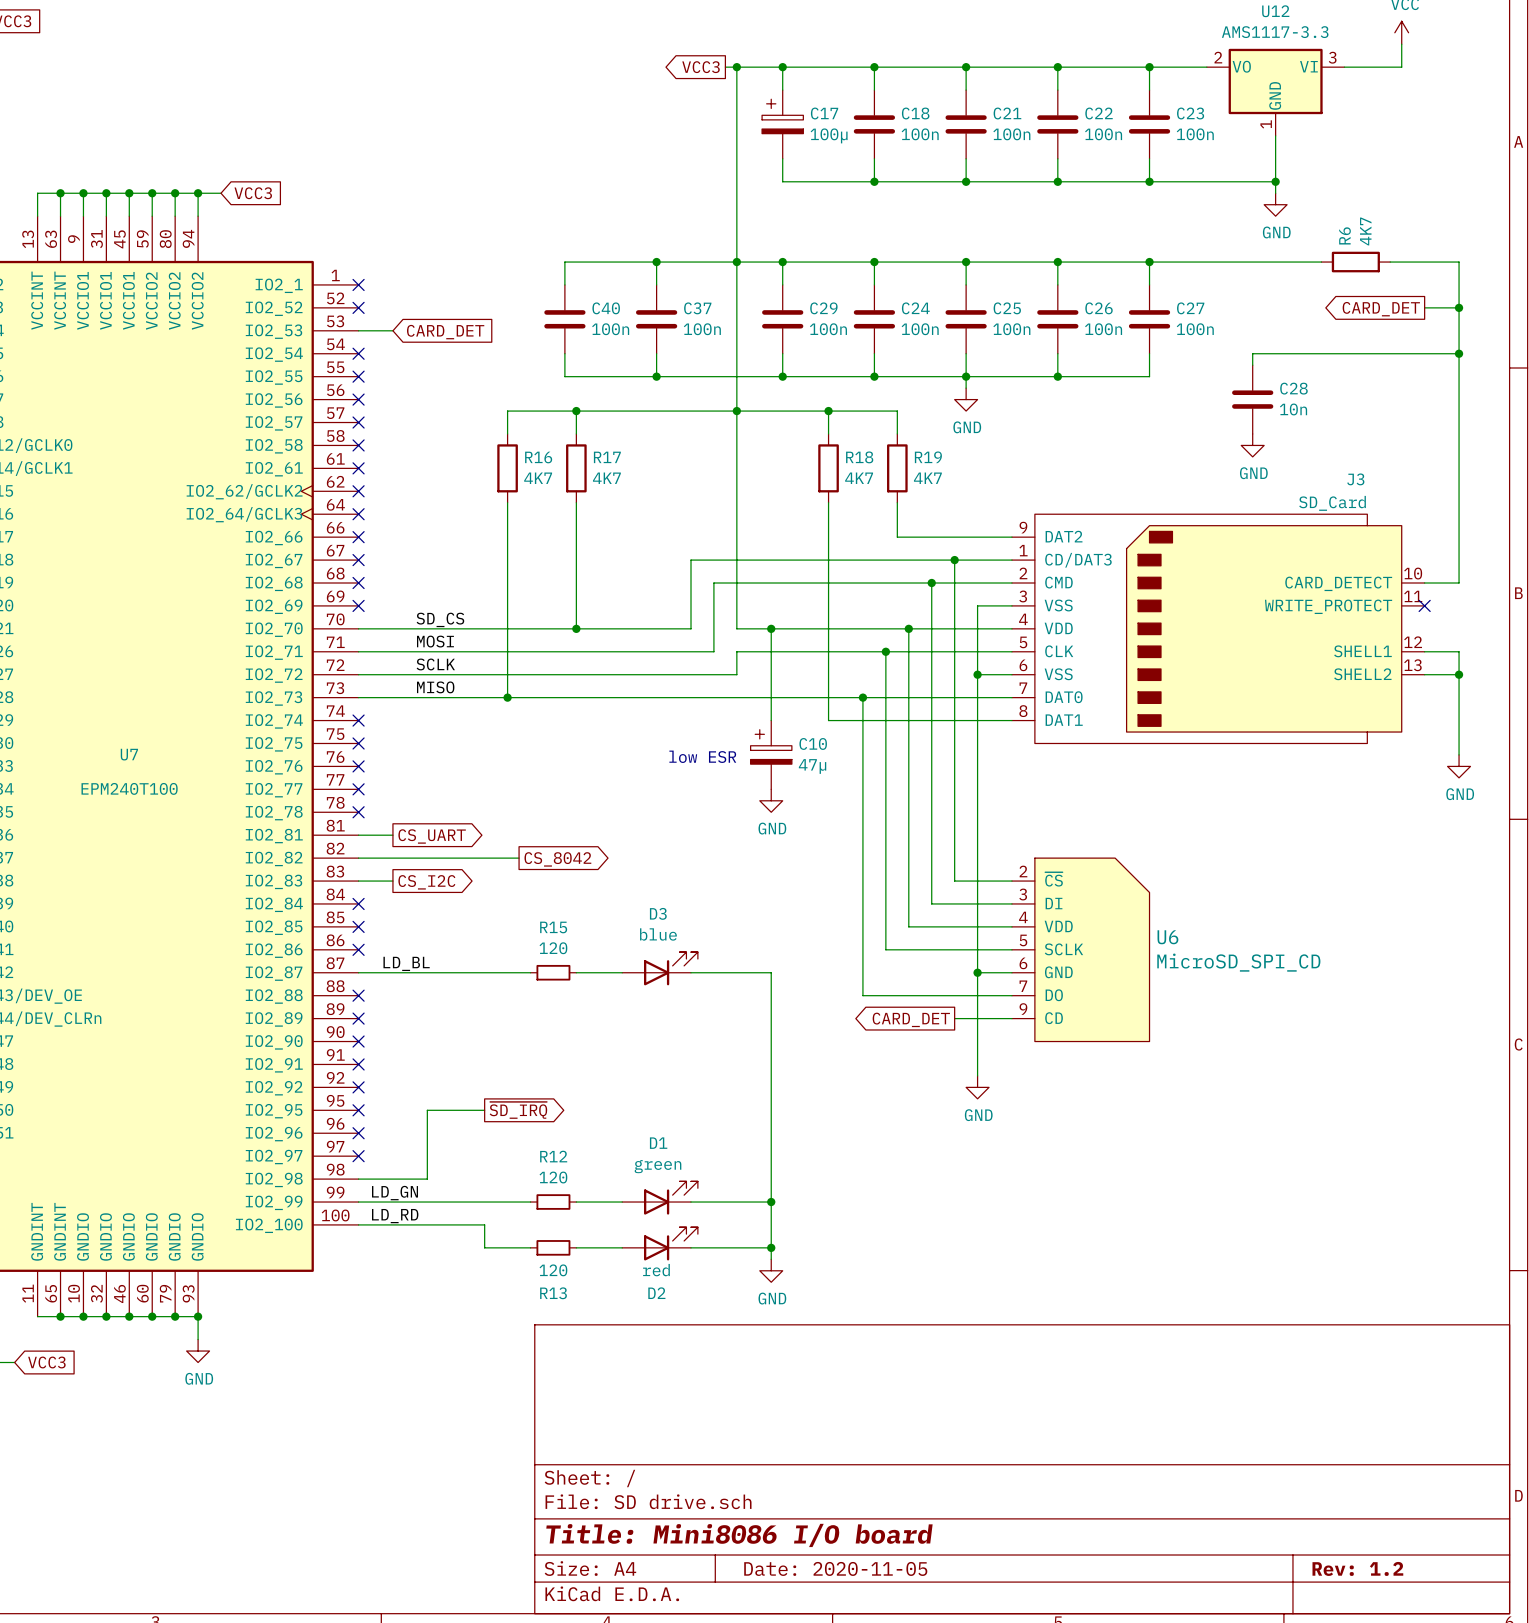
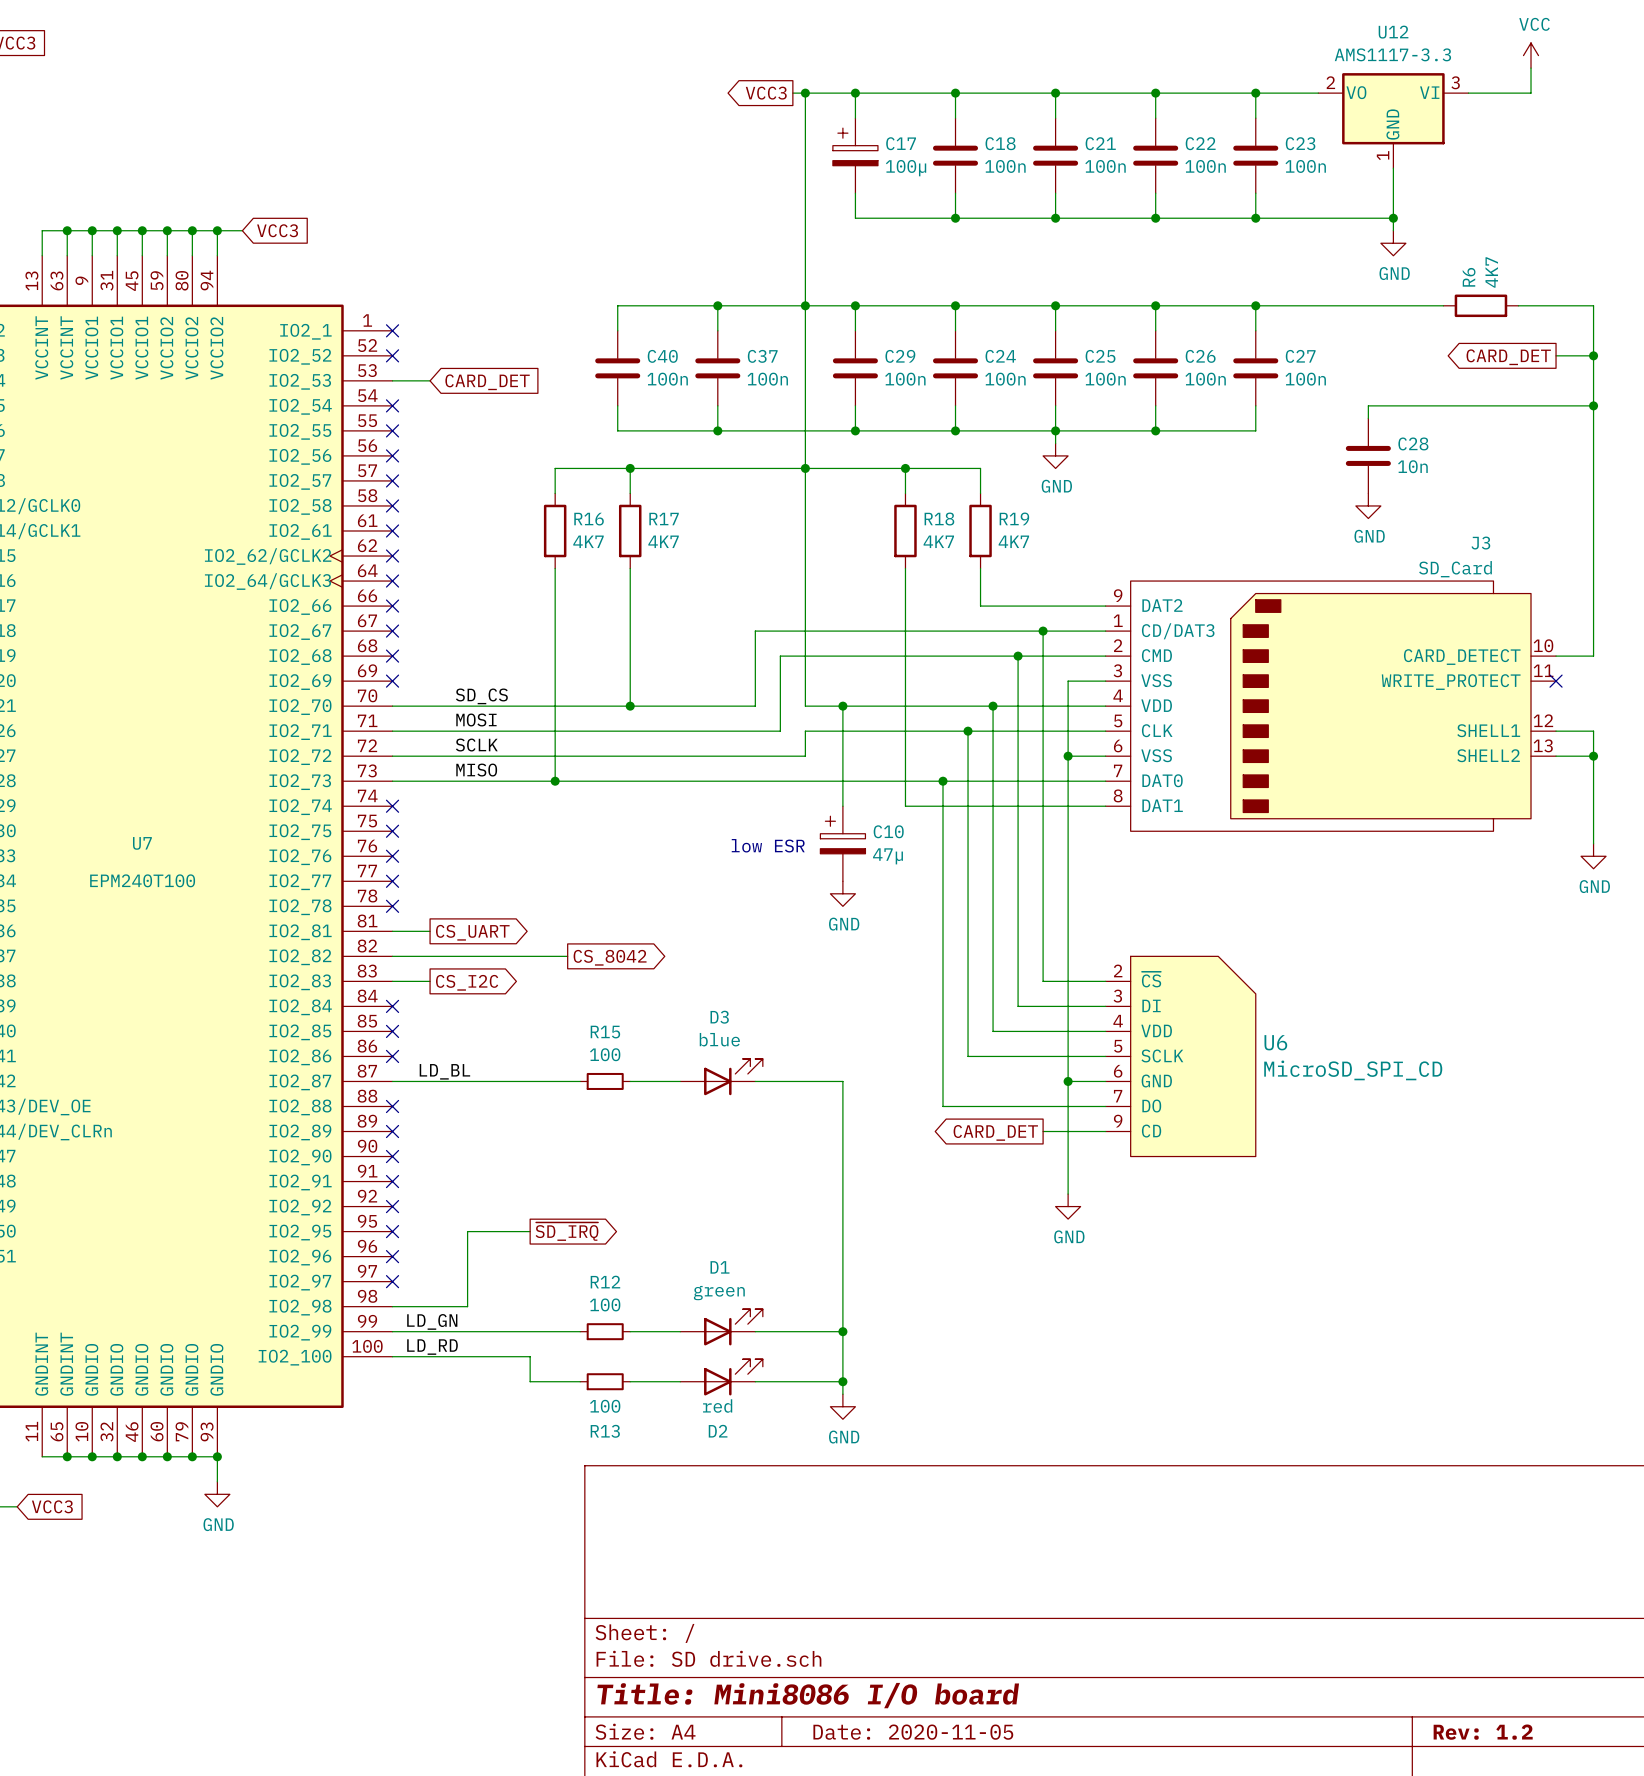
R15 value: 120 (553, 948) -> 100 (605, 1054)
R12 value: 120 (553, 1177) -> 100 (605, 1304)
R13 value: 120 (553, 1270) -> 100 (605, 1406)

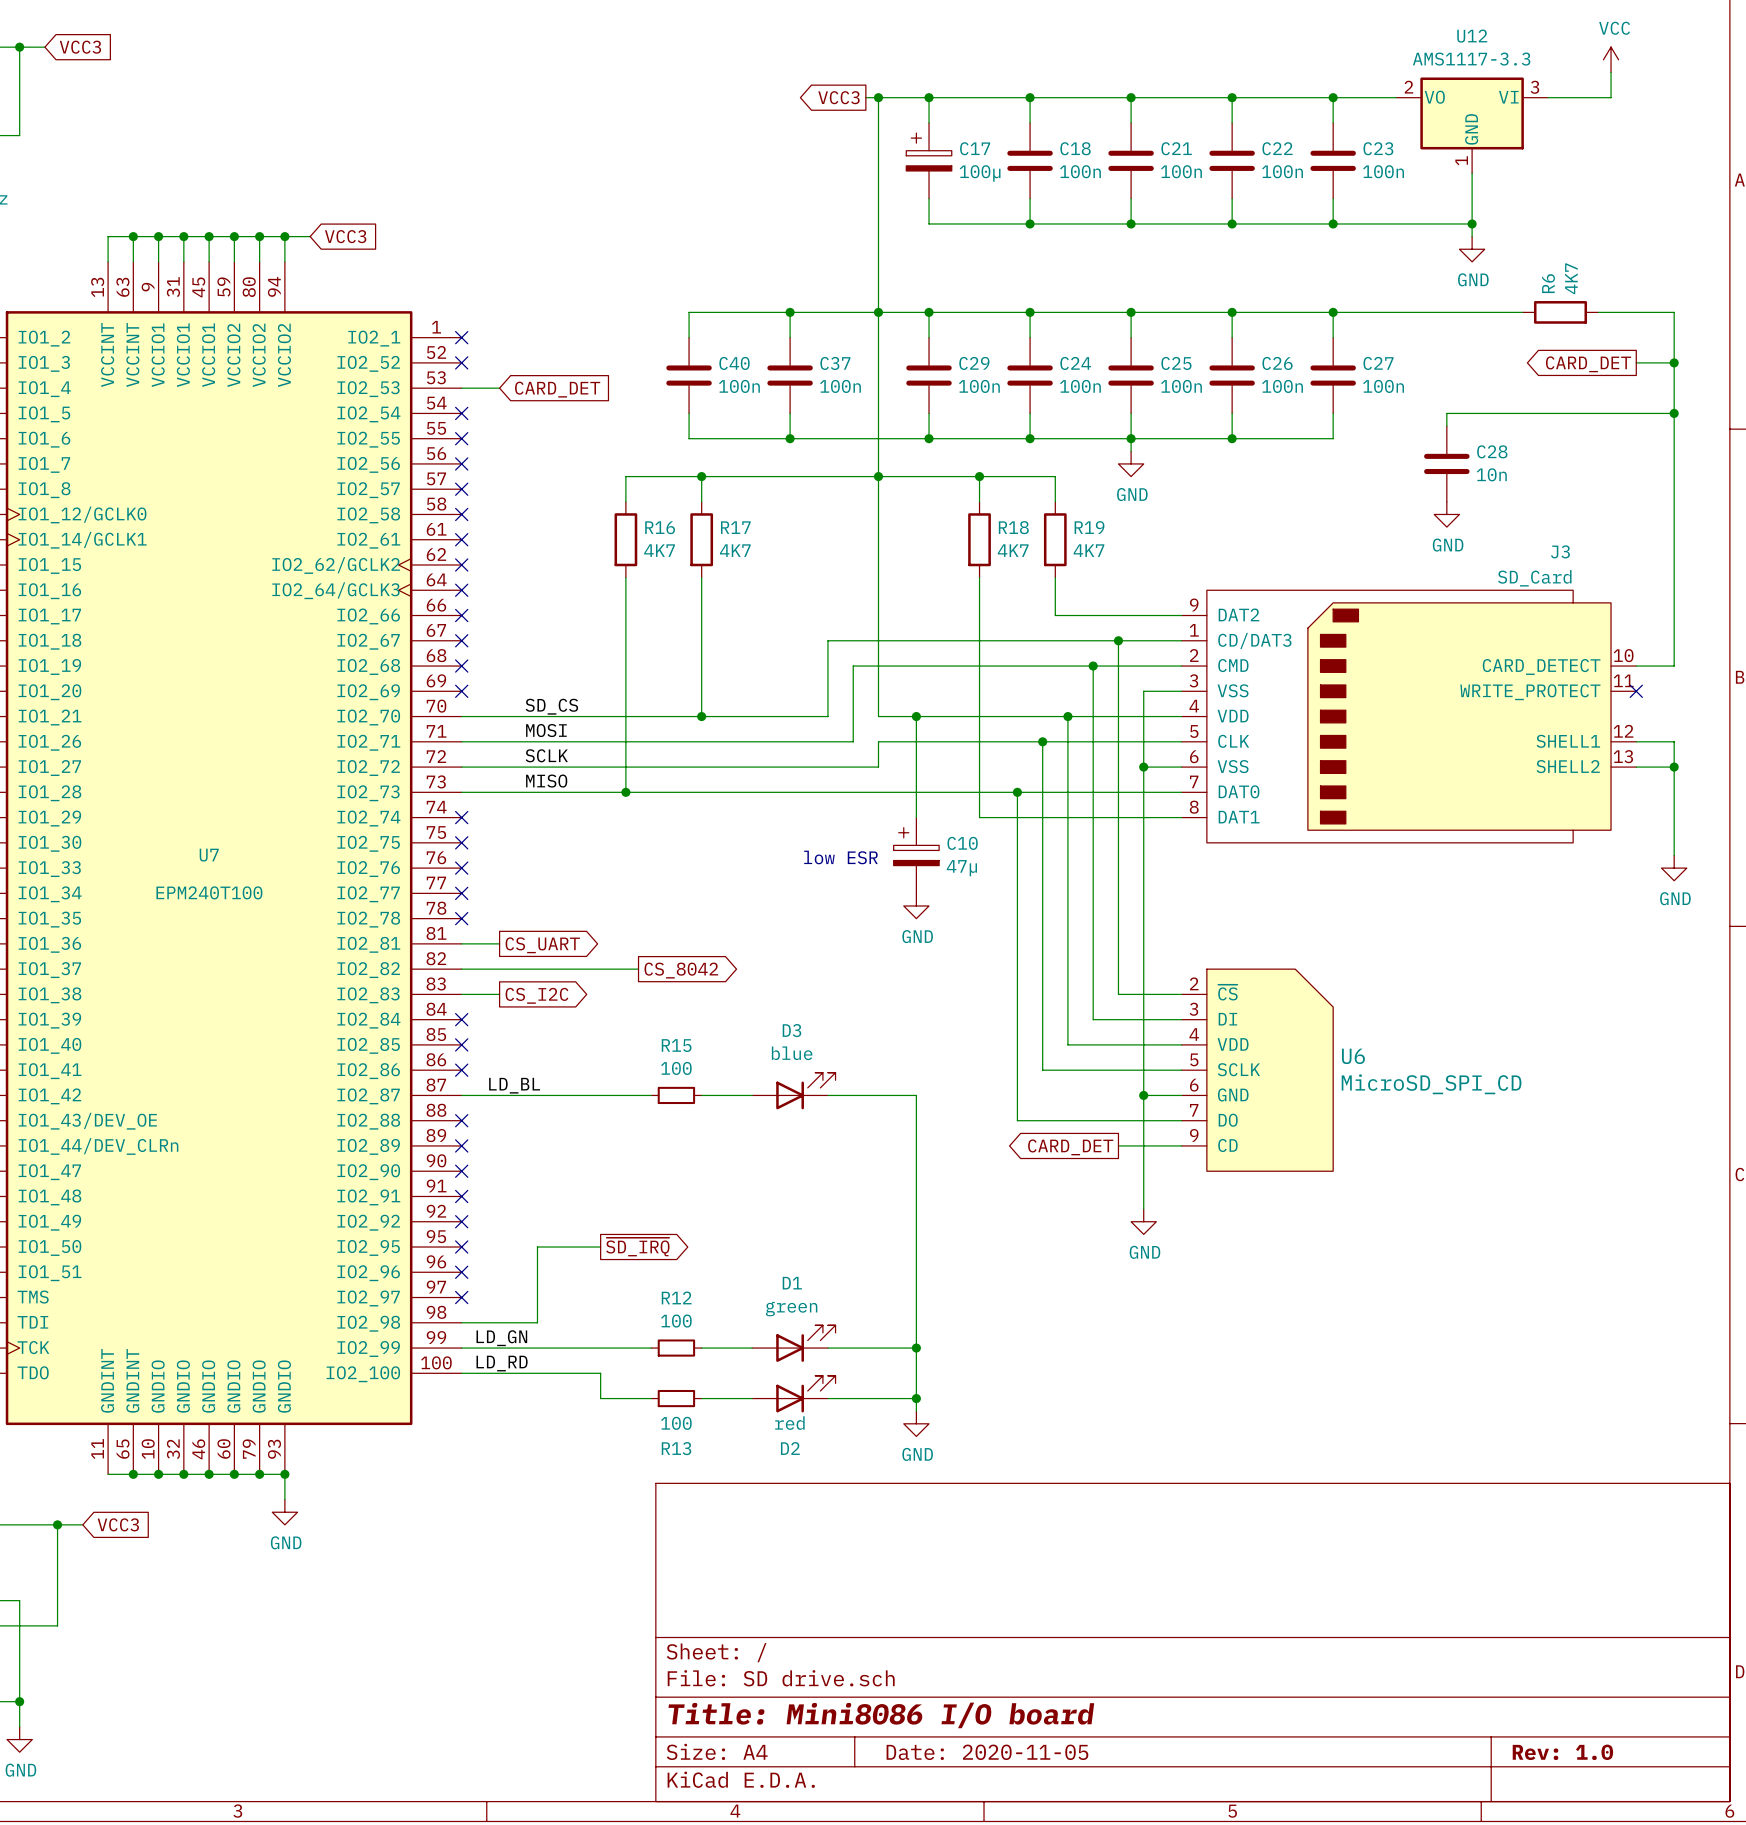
title block: Rev: 1.2 (1483, 1732) -> Rev: 1.0 (1562, 1752)

